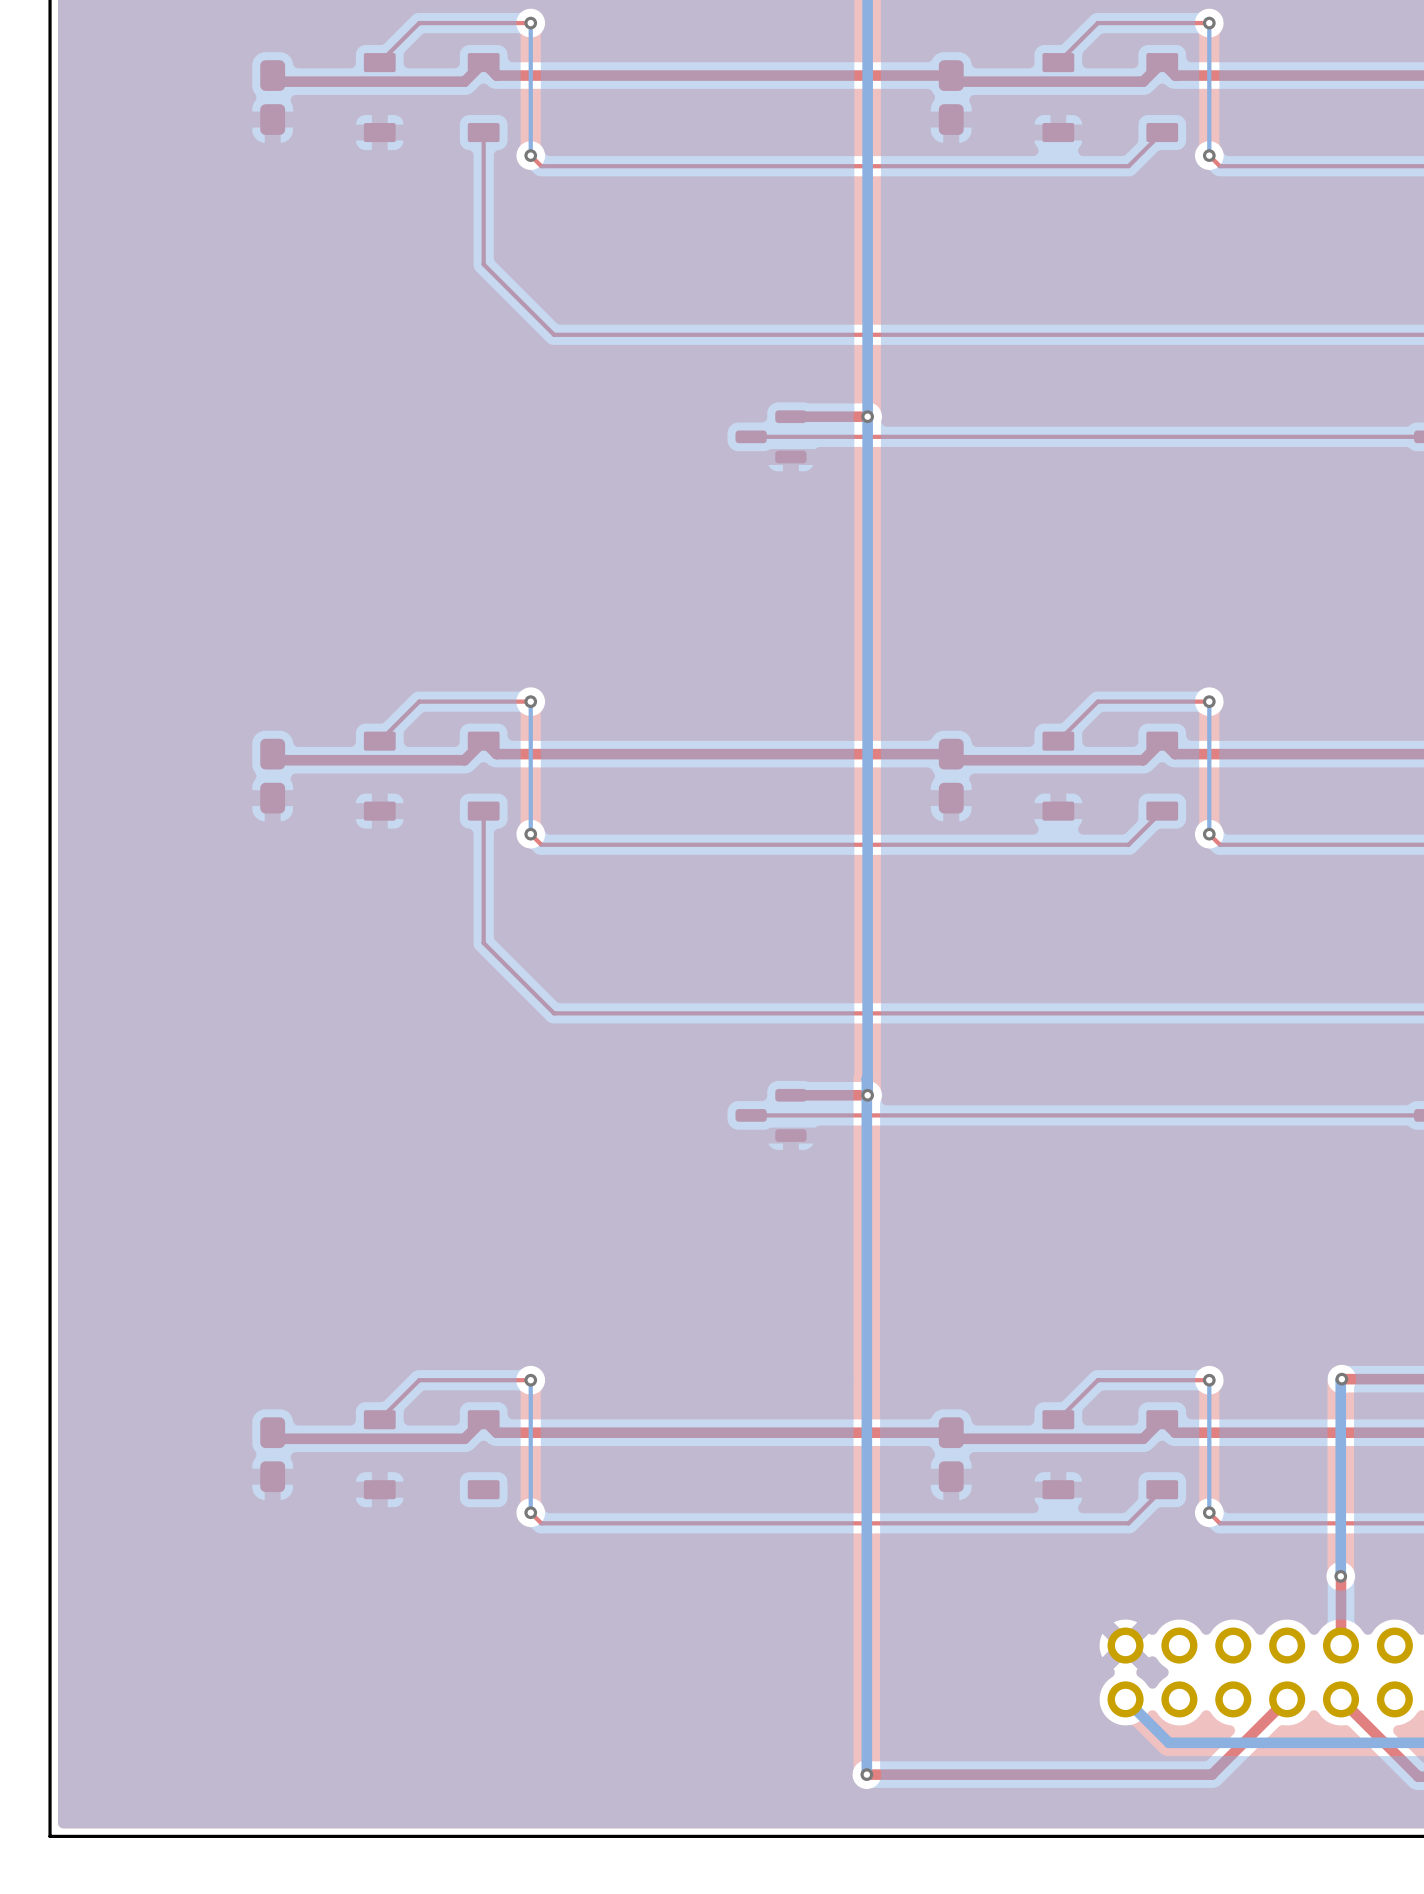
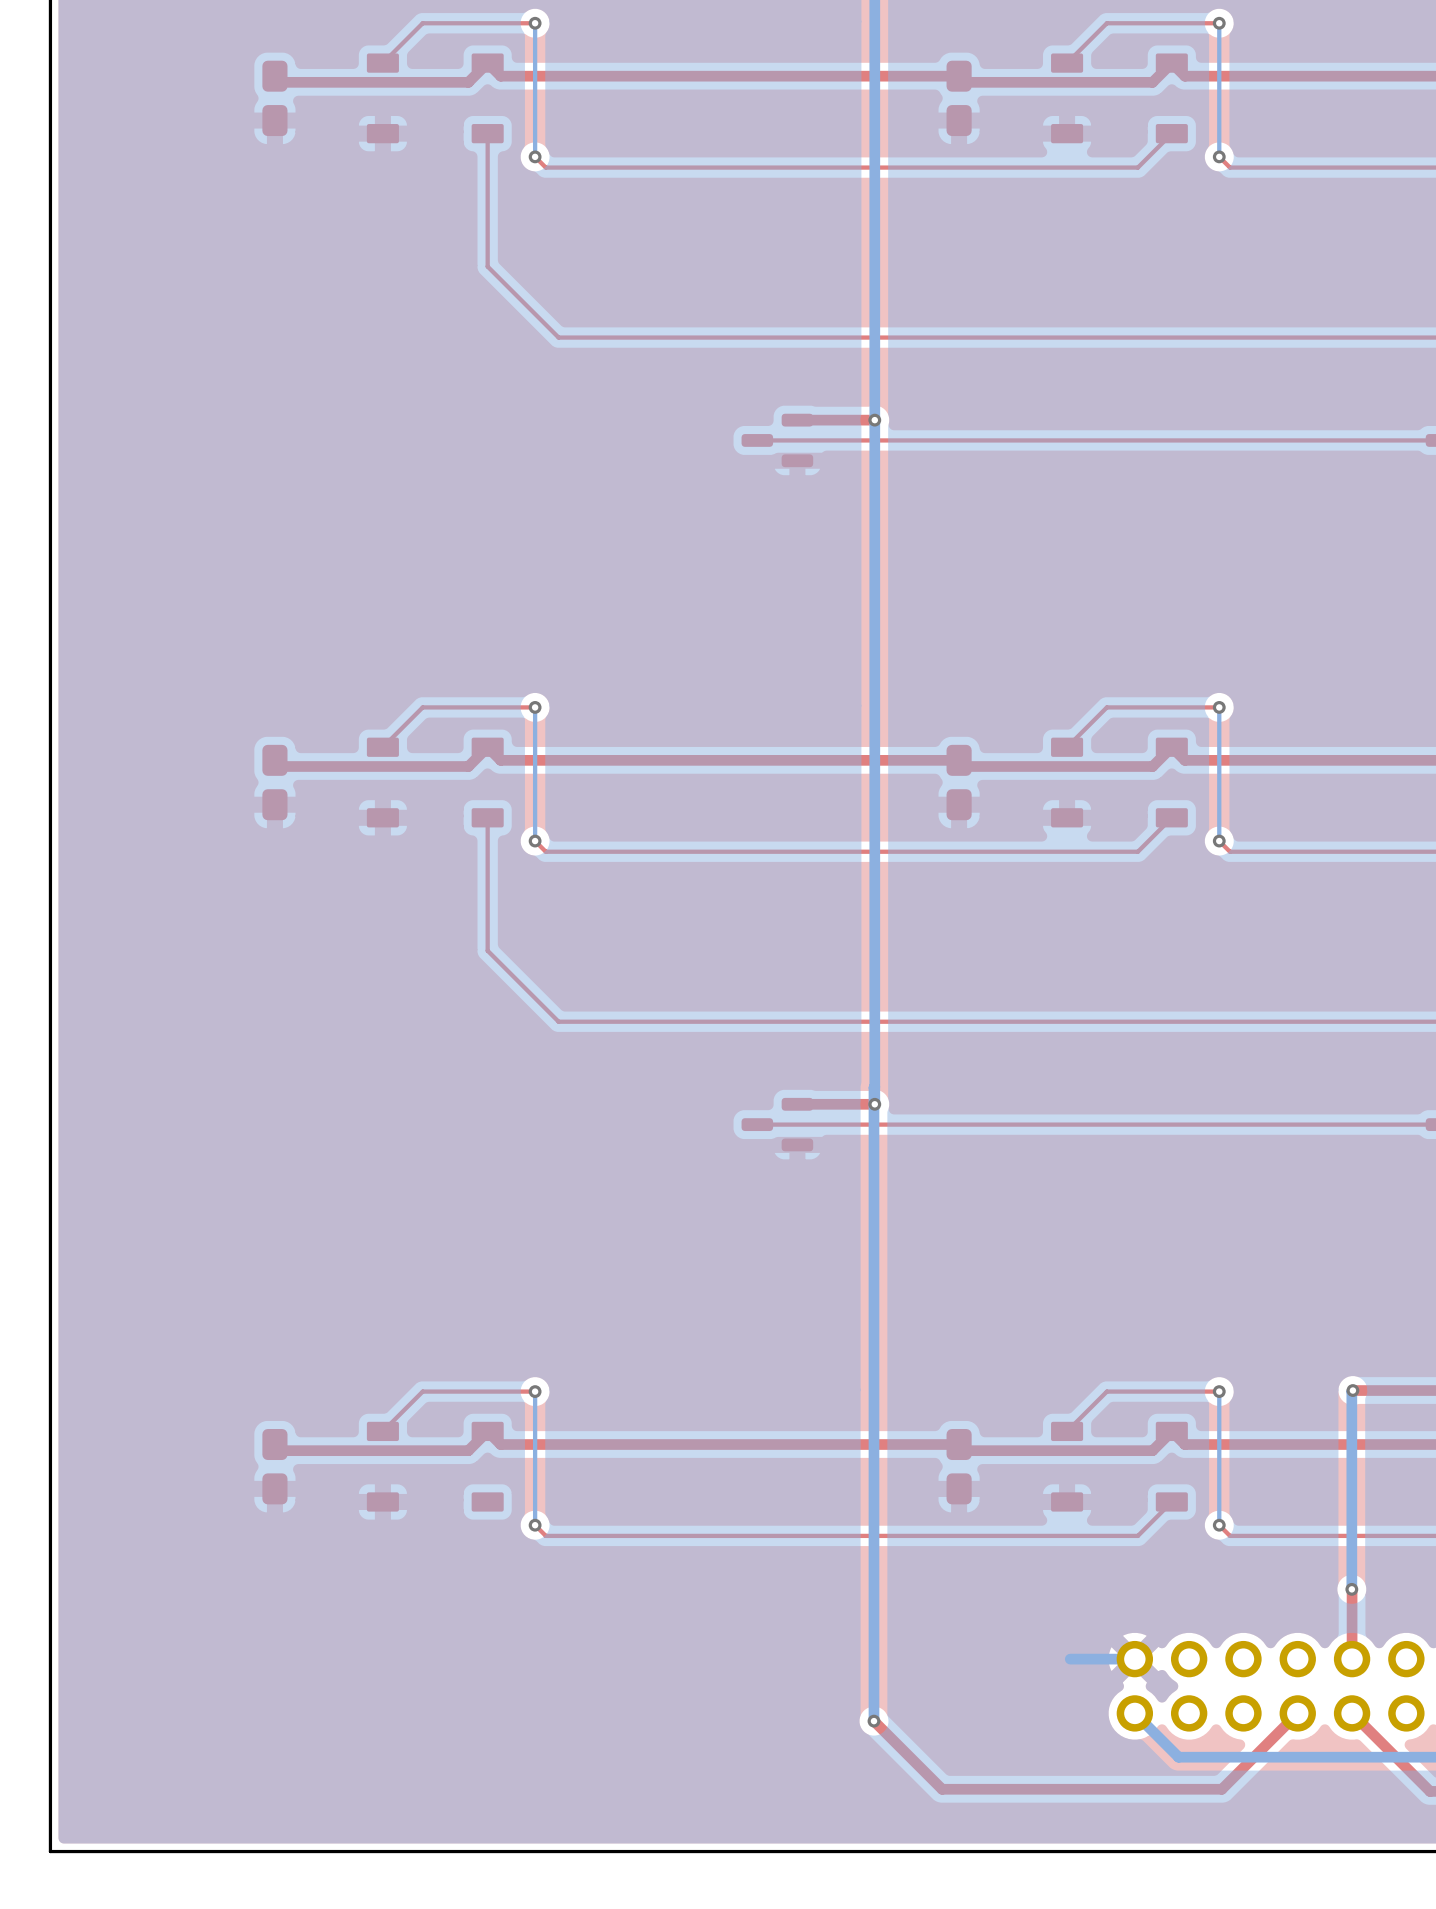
bottom track: none -> (1134, 1659) (1070, 1659)
bottom track: (866, 1707) (866, 1774) -> none
via position: (866, 1774) -> (873, 1721)
top track: (934, 1774) (866, 1774) -> (942, 1789) (873, 1721)

